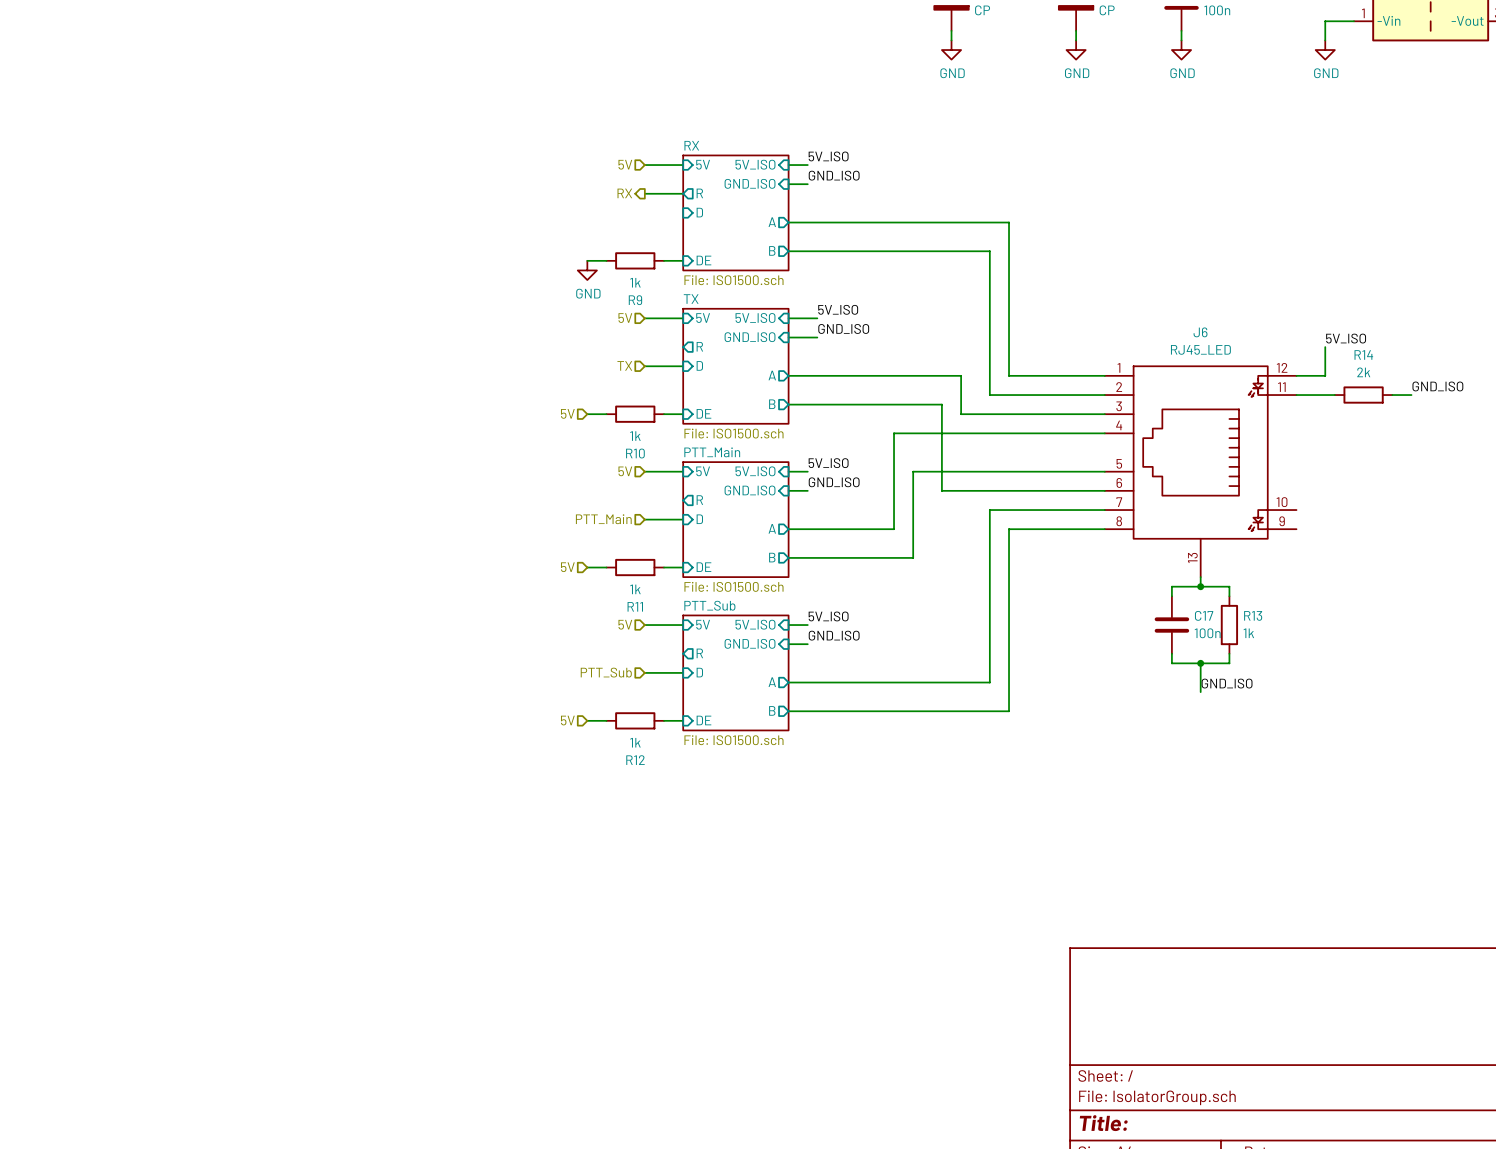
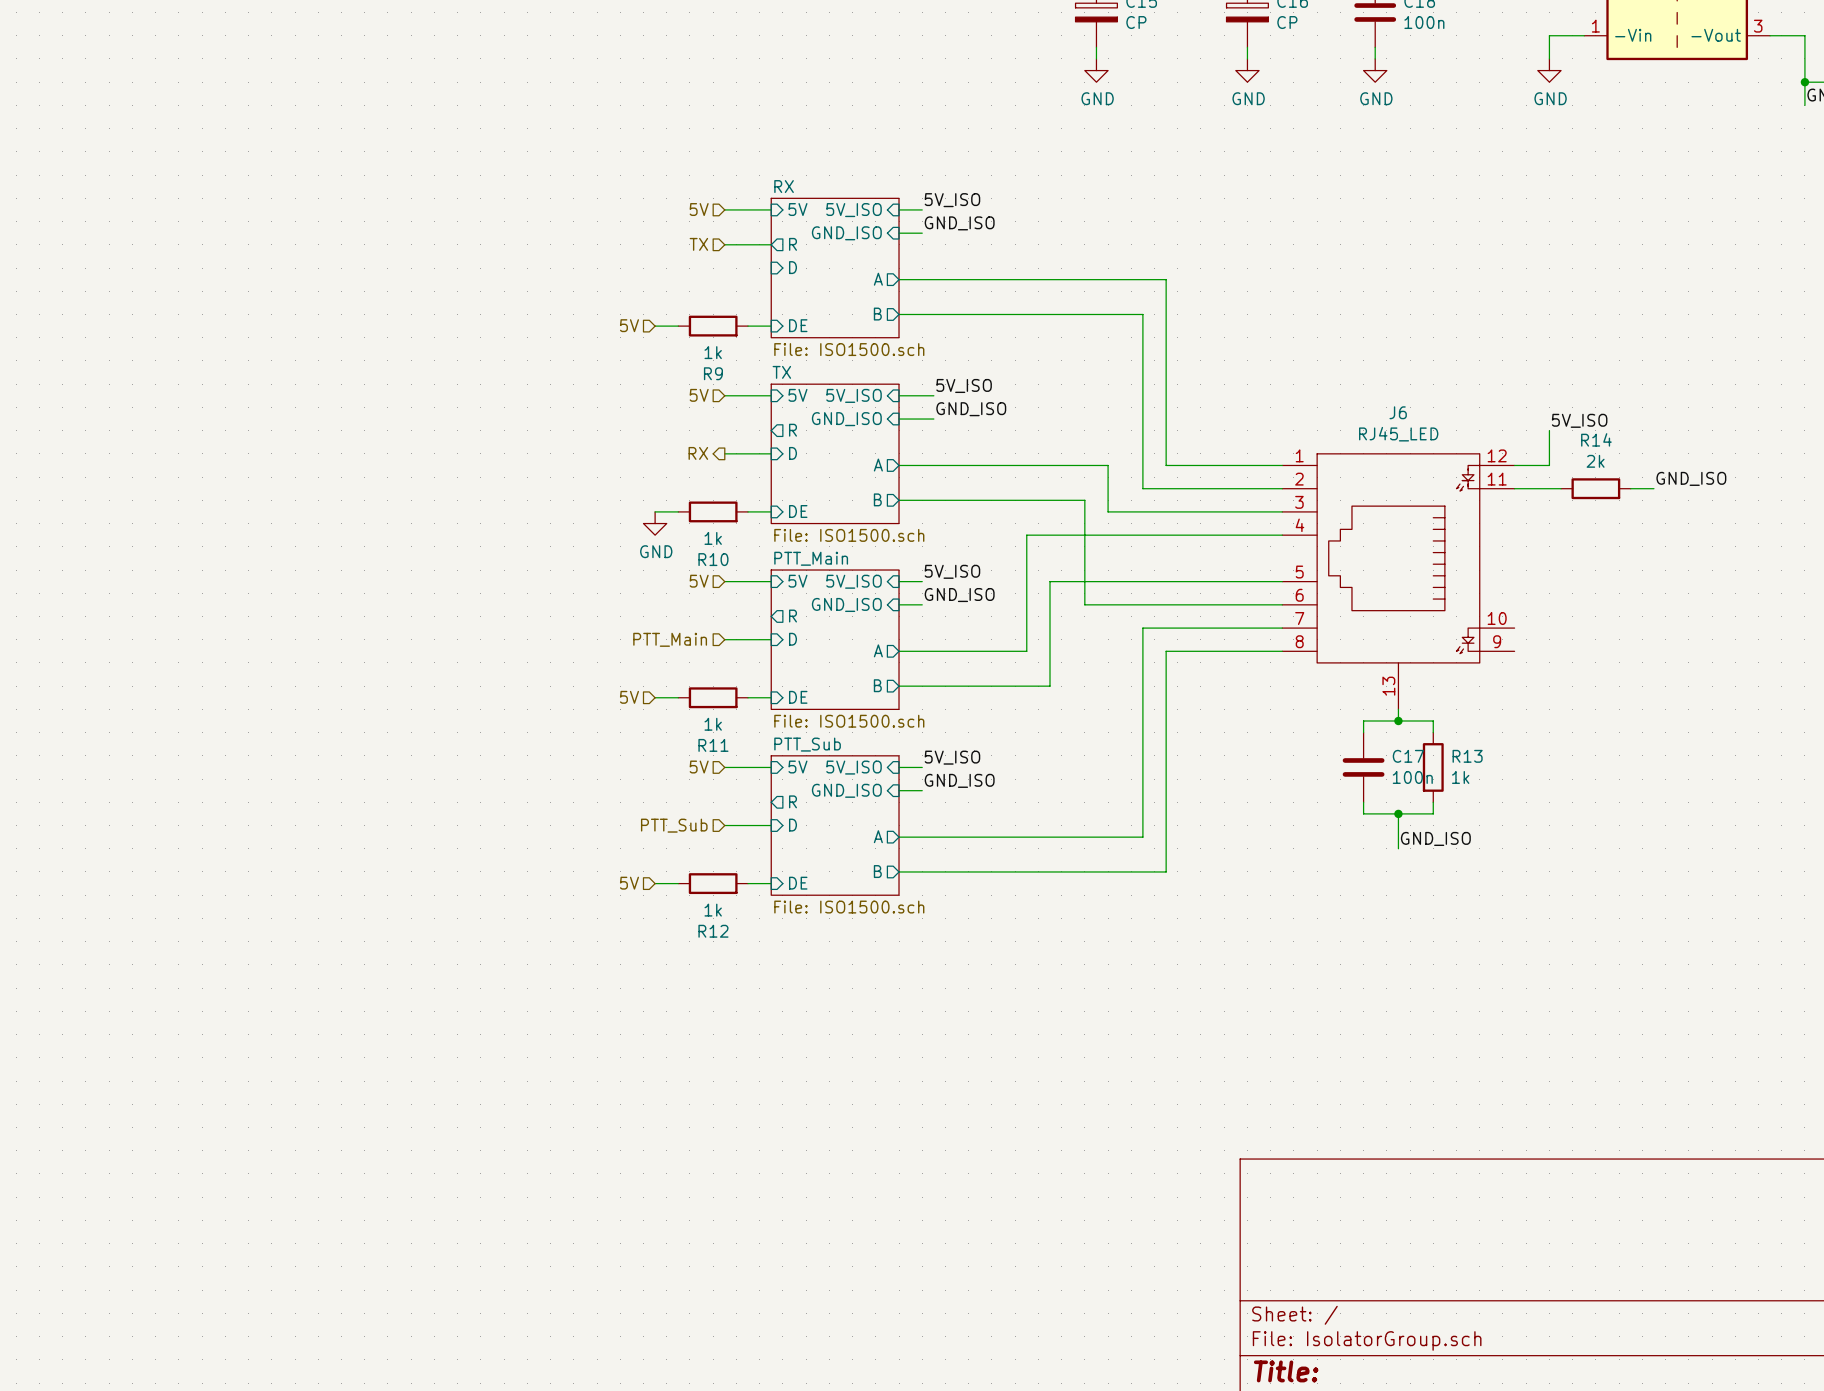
hierarchical label shape: output (624, 193) -> input (698, 244)
hierarchical label: RX (624, 193) -> TX (698, 244)
power symbol position: GND (587, 270) -> GND (655, 523)
hierarchical label shape: input (624, 365) -> output (698, 453)
hierarchical label: TX (624, 365) -> RX (698, 453)
hierarchical label position: 5V (567, 413) -> 5V (629, 325)

